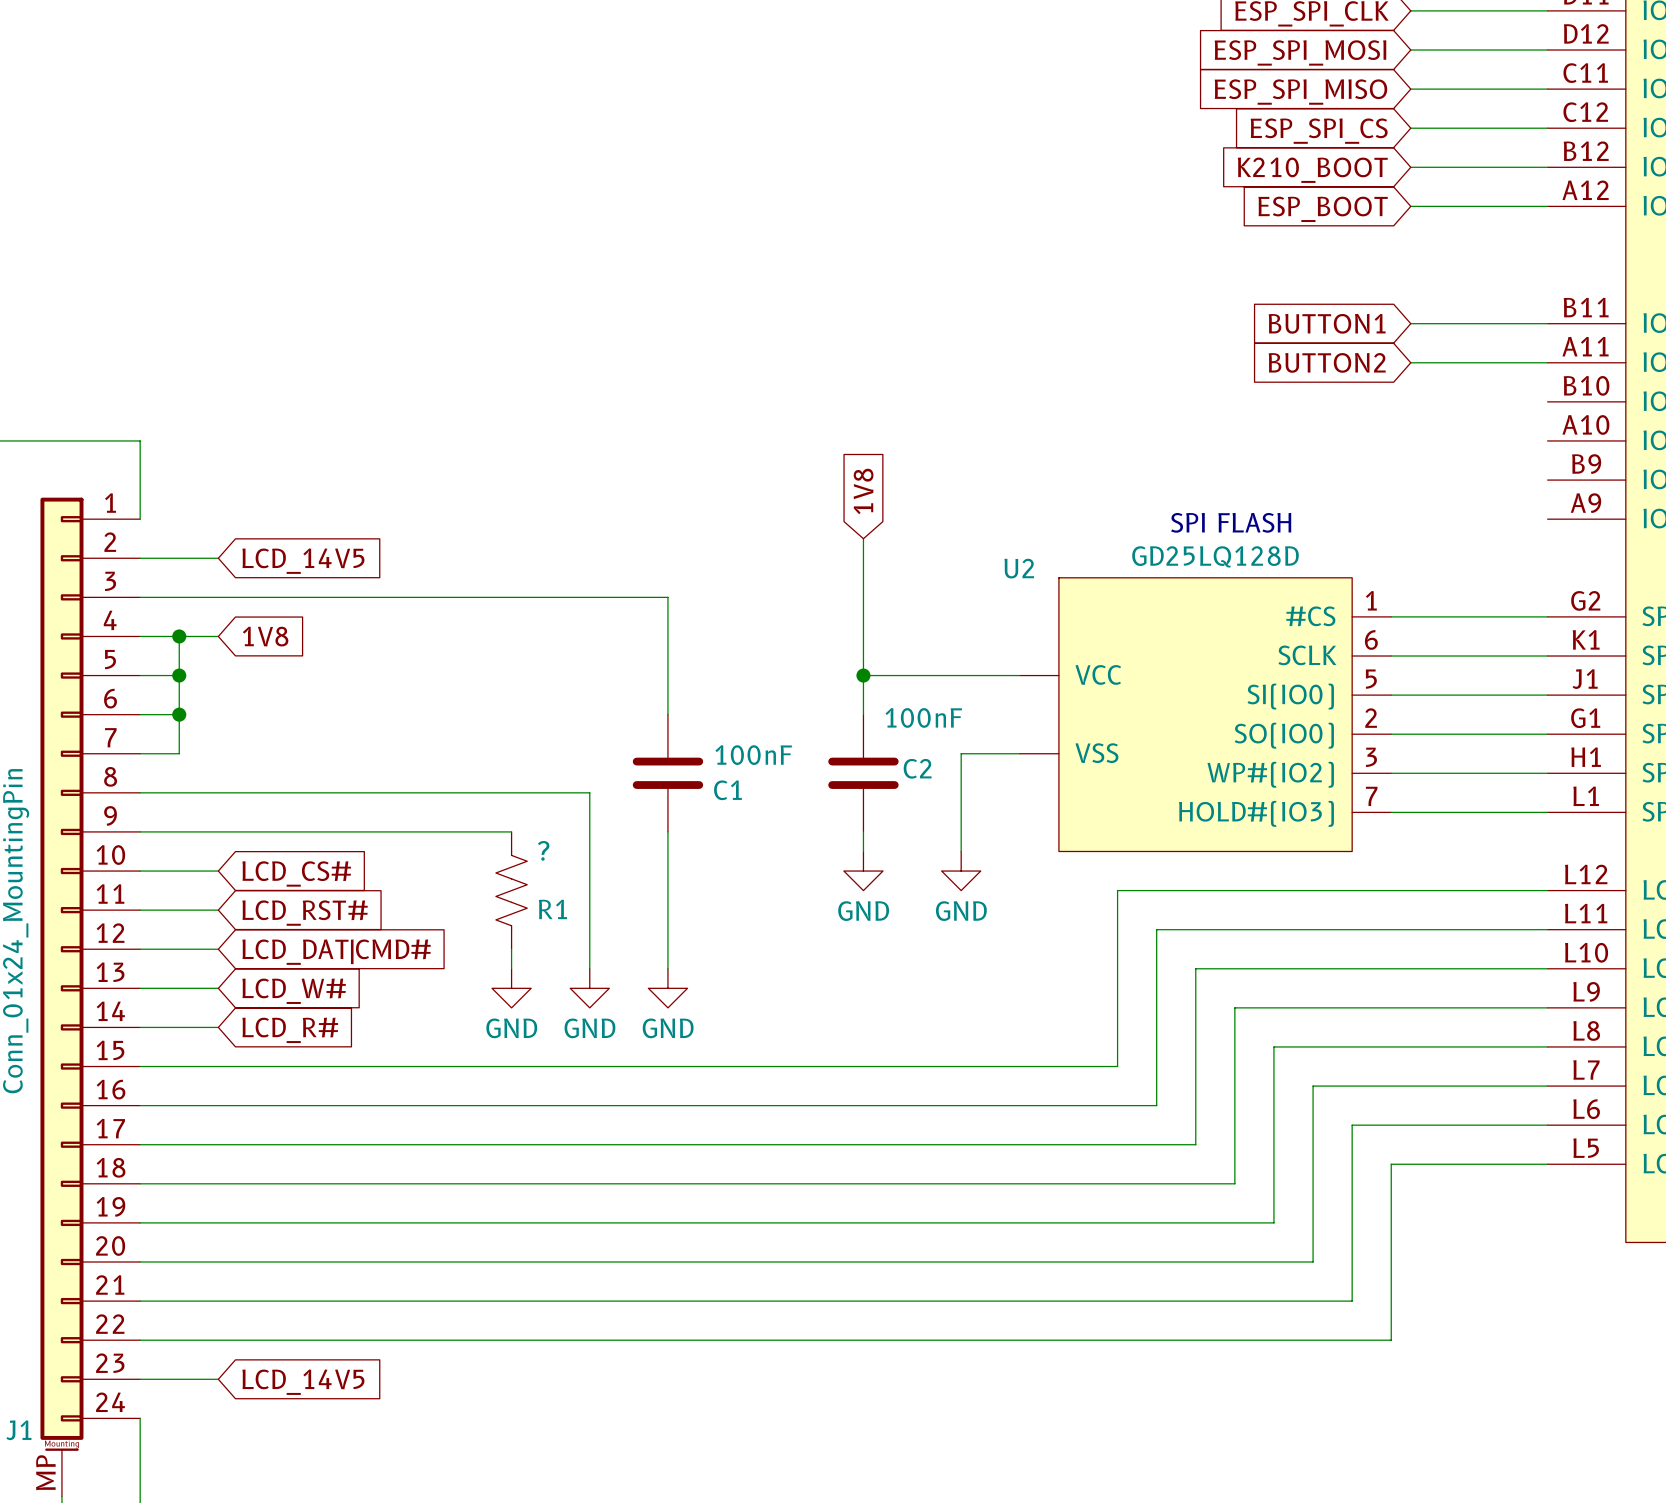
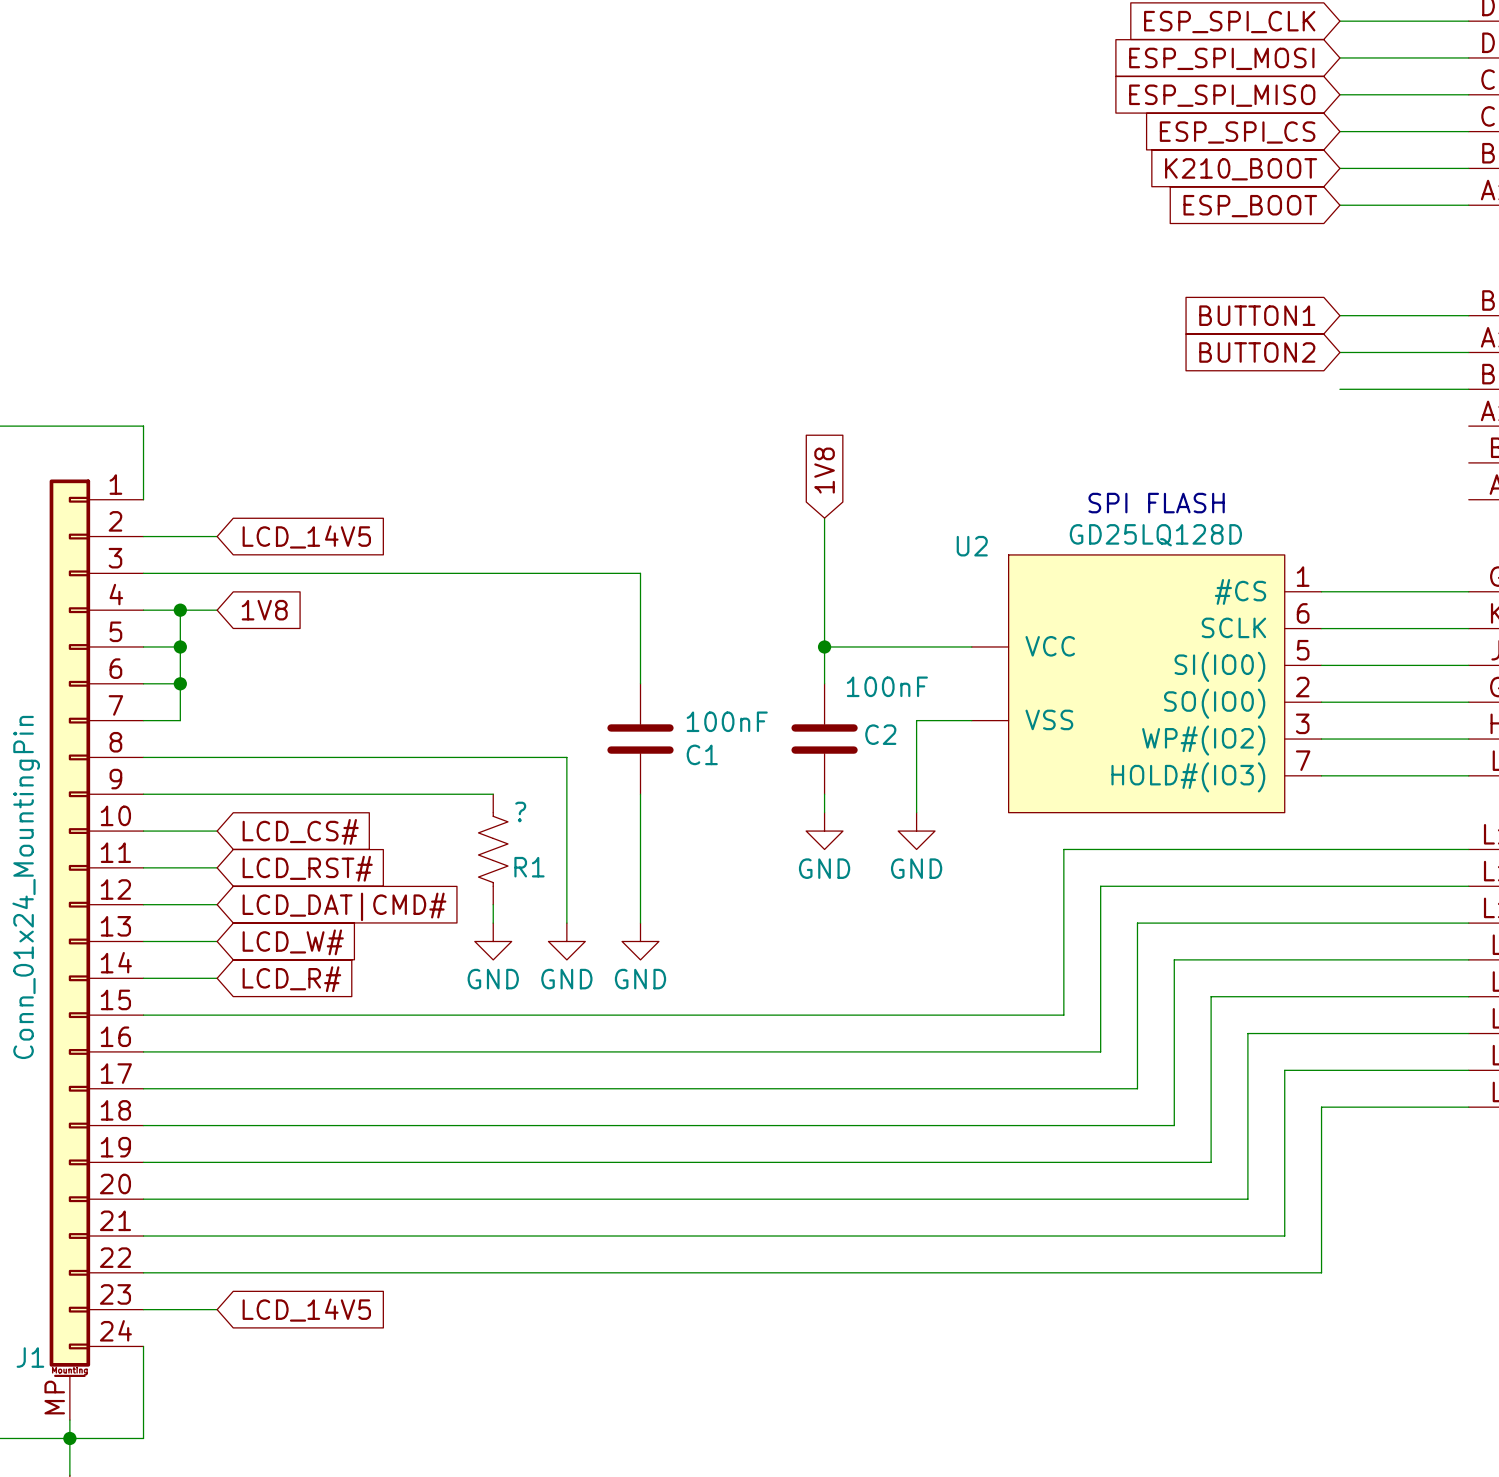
wire: none -> (1339, 389) (1468, 389)

